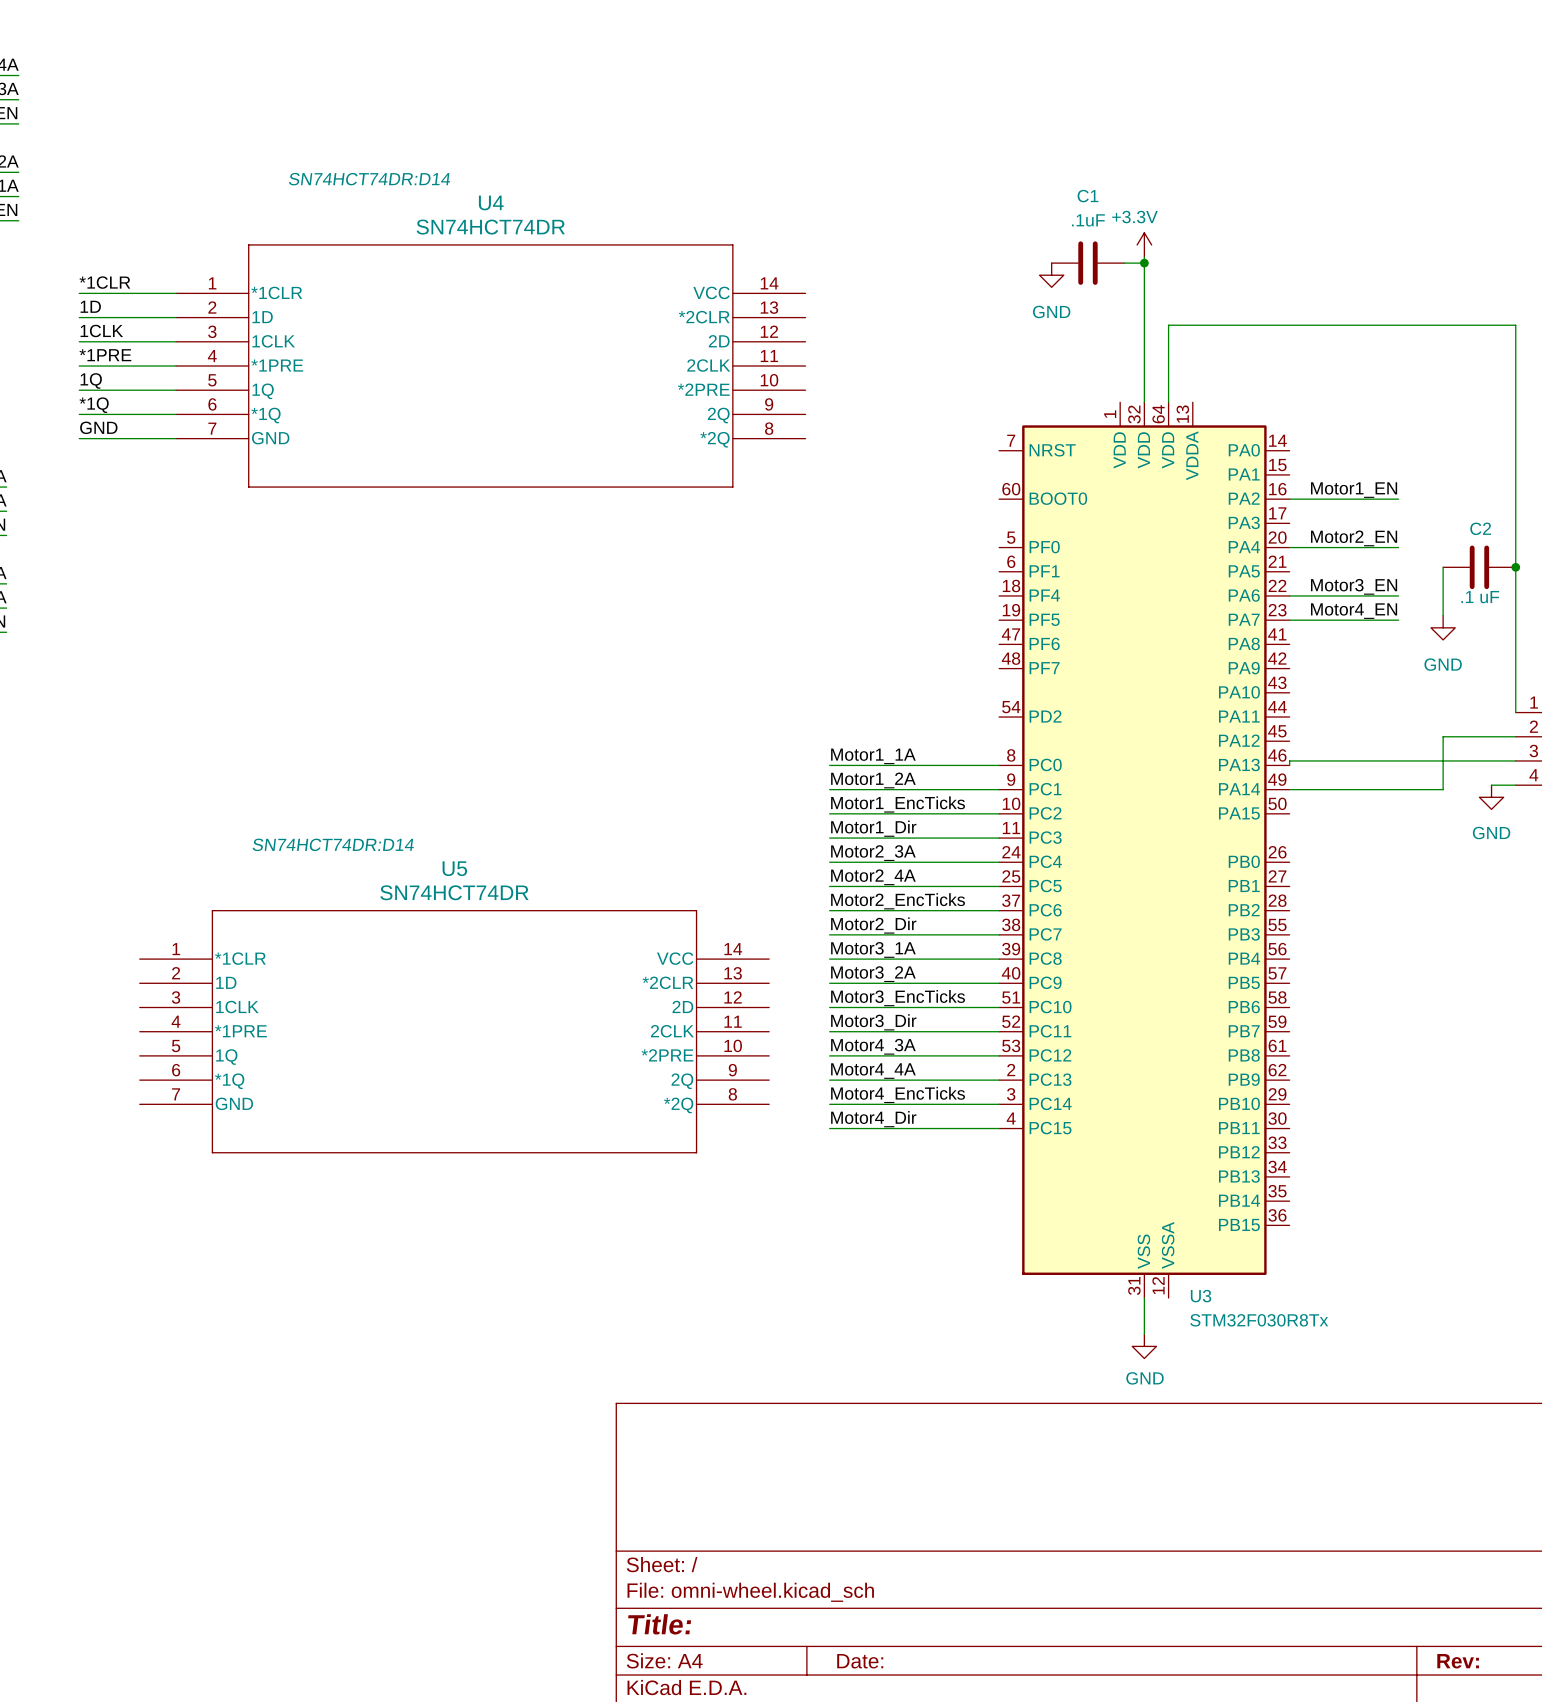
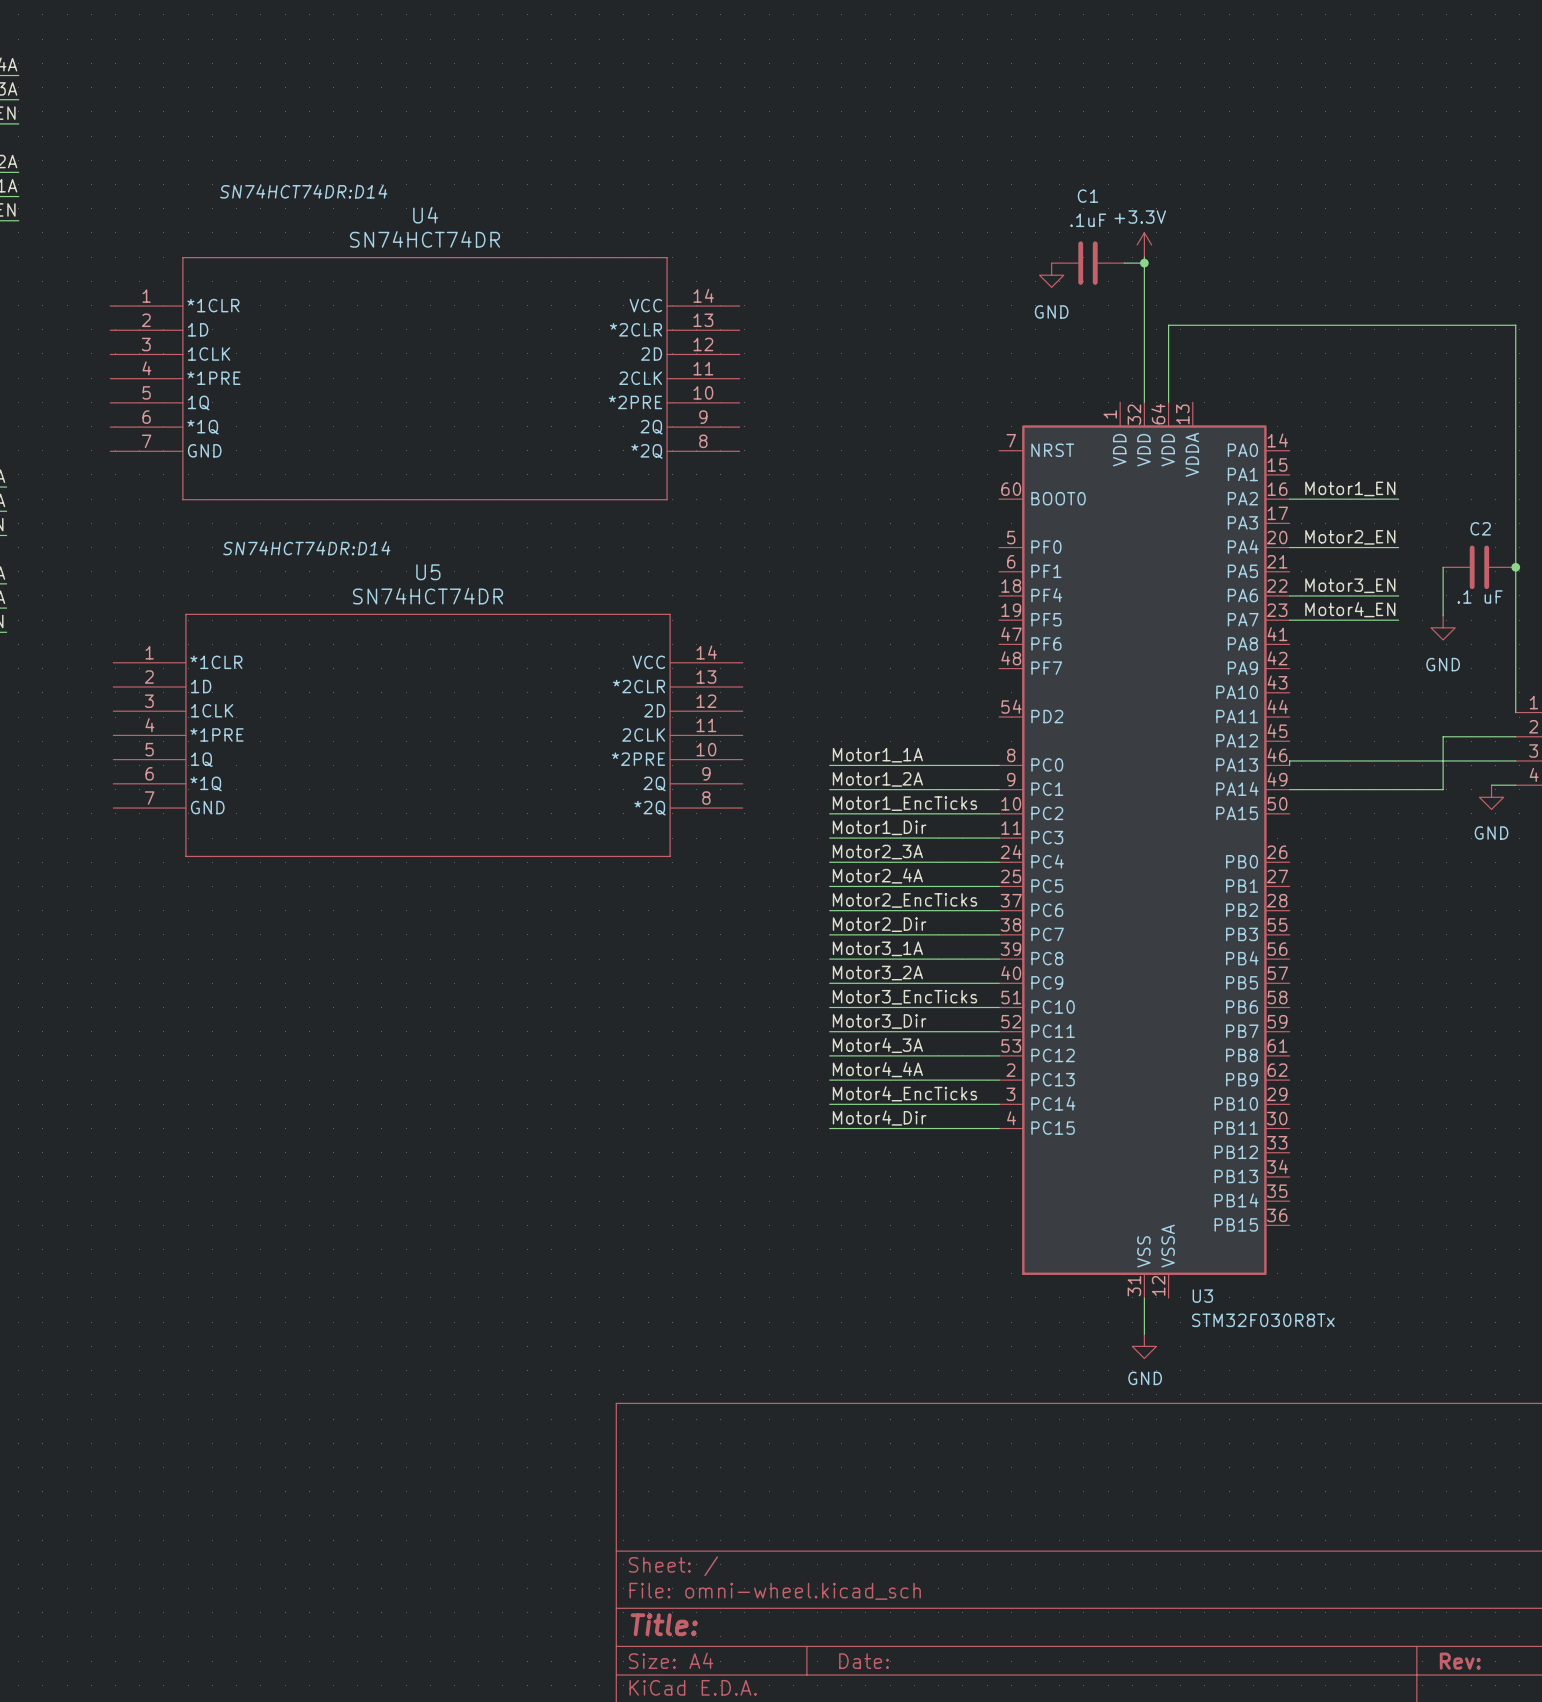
label: *1CLR (104, 282) -> none
wire: (79, 293) (176, 293) -> none
label: 1D (90, 306) -> none
wire: (79, 317) (176, 317) -> none
label: 1CLK (101, 330) -> none
wire: (79, 341) (176, 341) -> none
label: *1PRE (105, 355) -> none
wire: (79, 366) (176, 366) -> none
U4 position: (490, 366) -> (424, 378)
label: 1Q (91, 380) -> none
wire: (79, 390) (176, 390) -> none
label: *1Q (94, 405) -> none
wire: (79, 414) (176, 414) -> none
label: GND (98, 427) -> none
wire: (79, 438) (176, 438) -> none
U5 position: (454, 1031) -> (428, 735)

